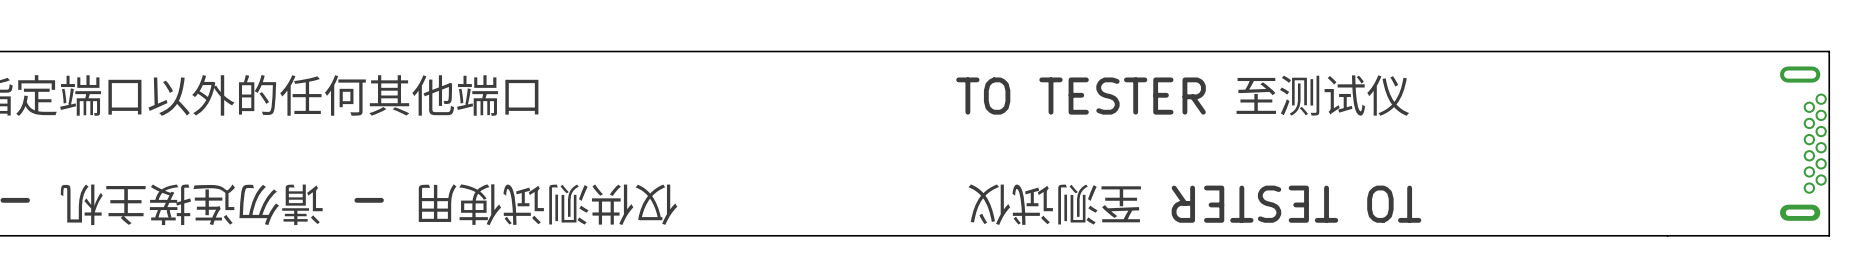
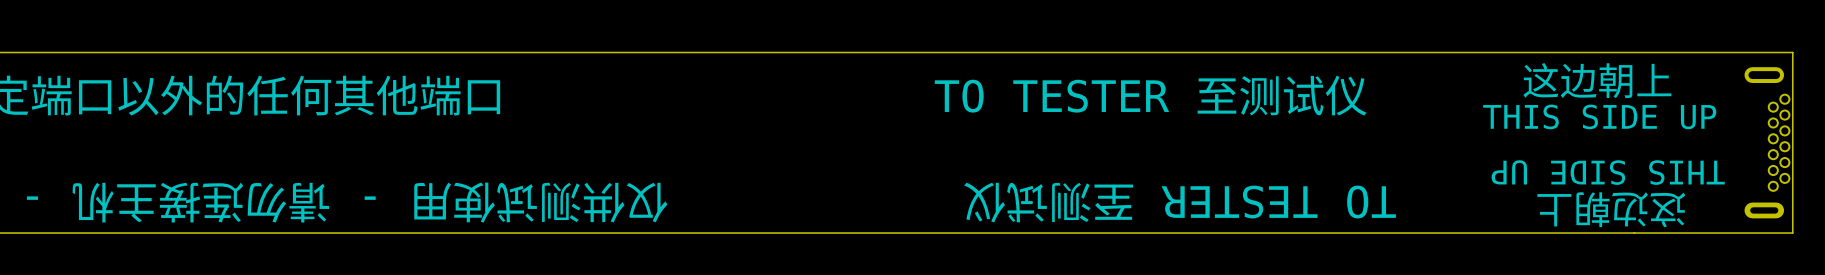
text: none -> 这边朝上 (1597, 80)
text: none -> THIS SIDE UP (1599, 116)
text: none -> THIS SIDE UP (1608, 172)
text: none -> 这边朝上 (1611, 209)

